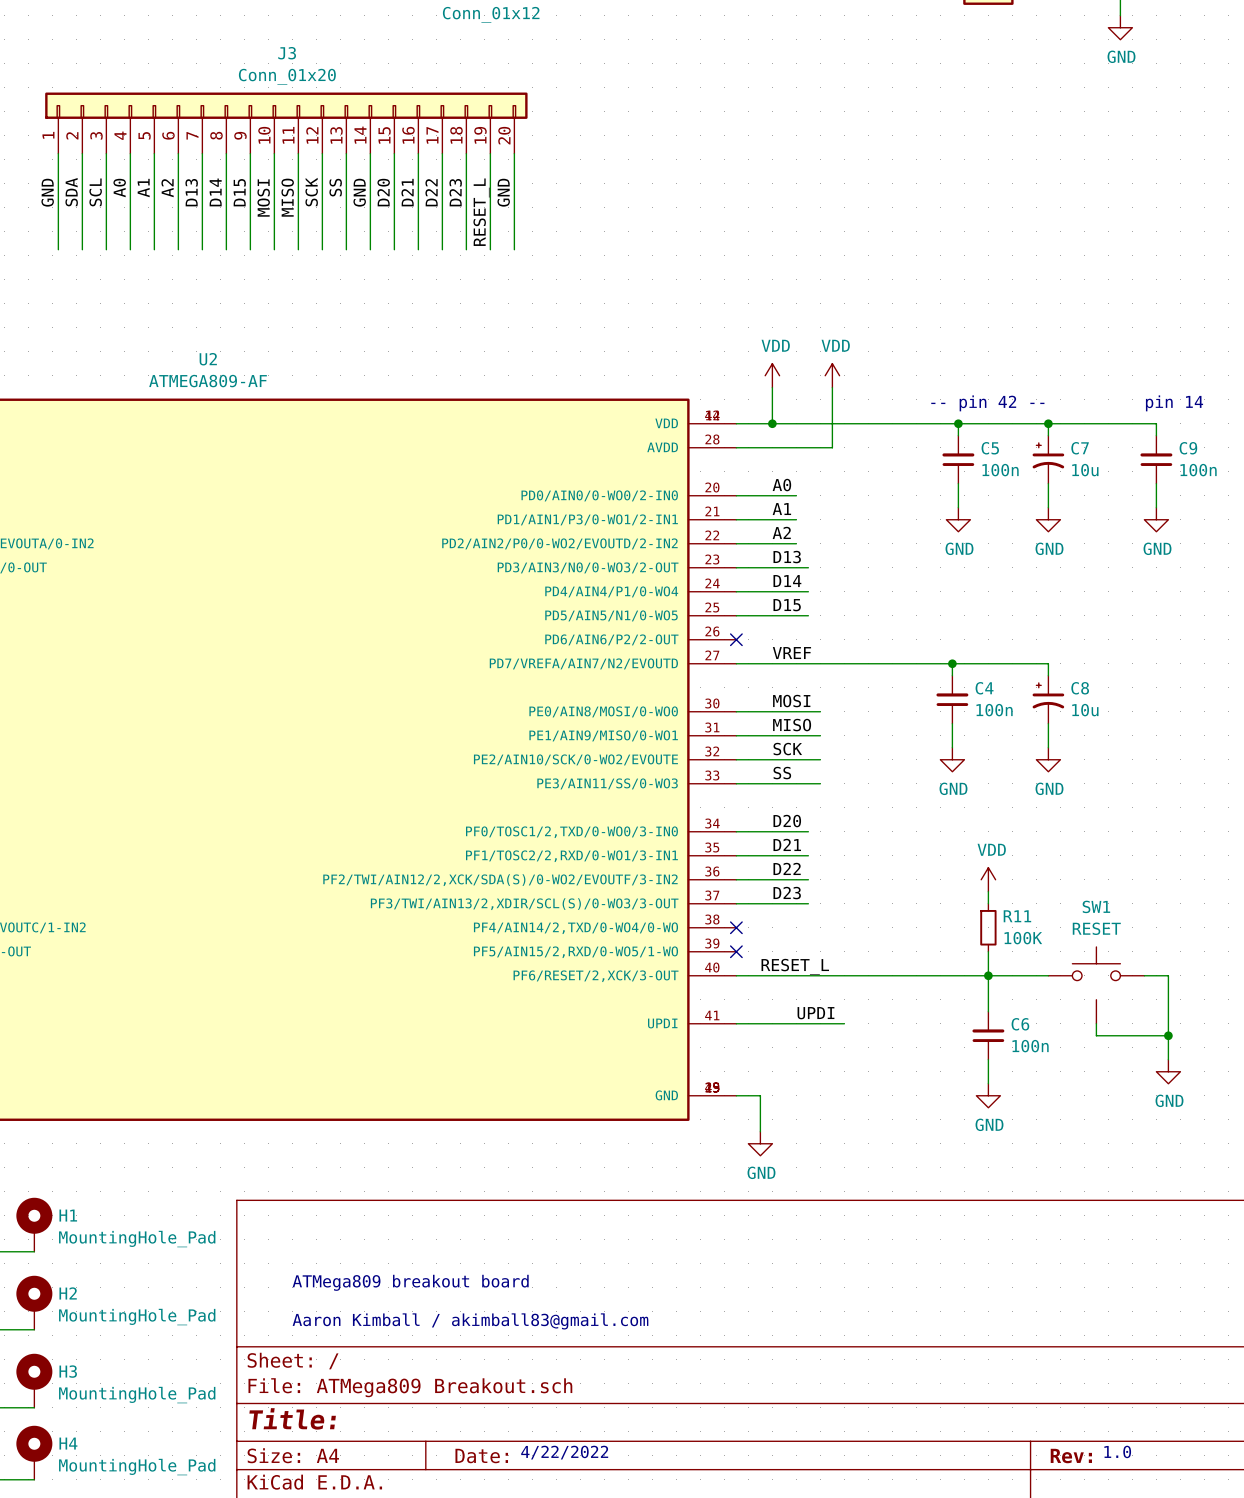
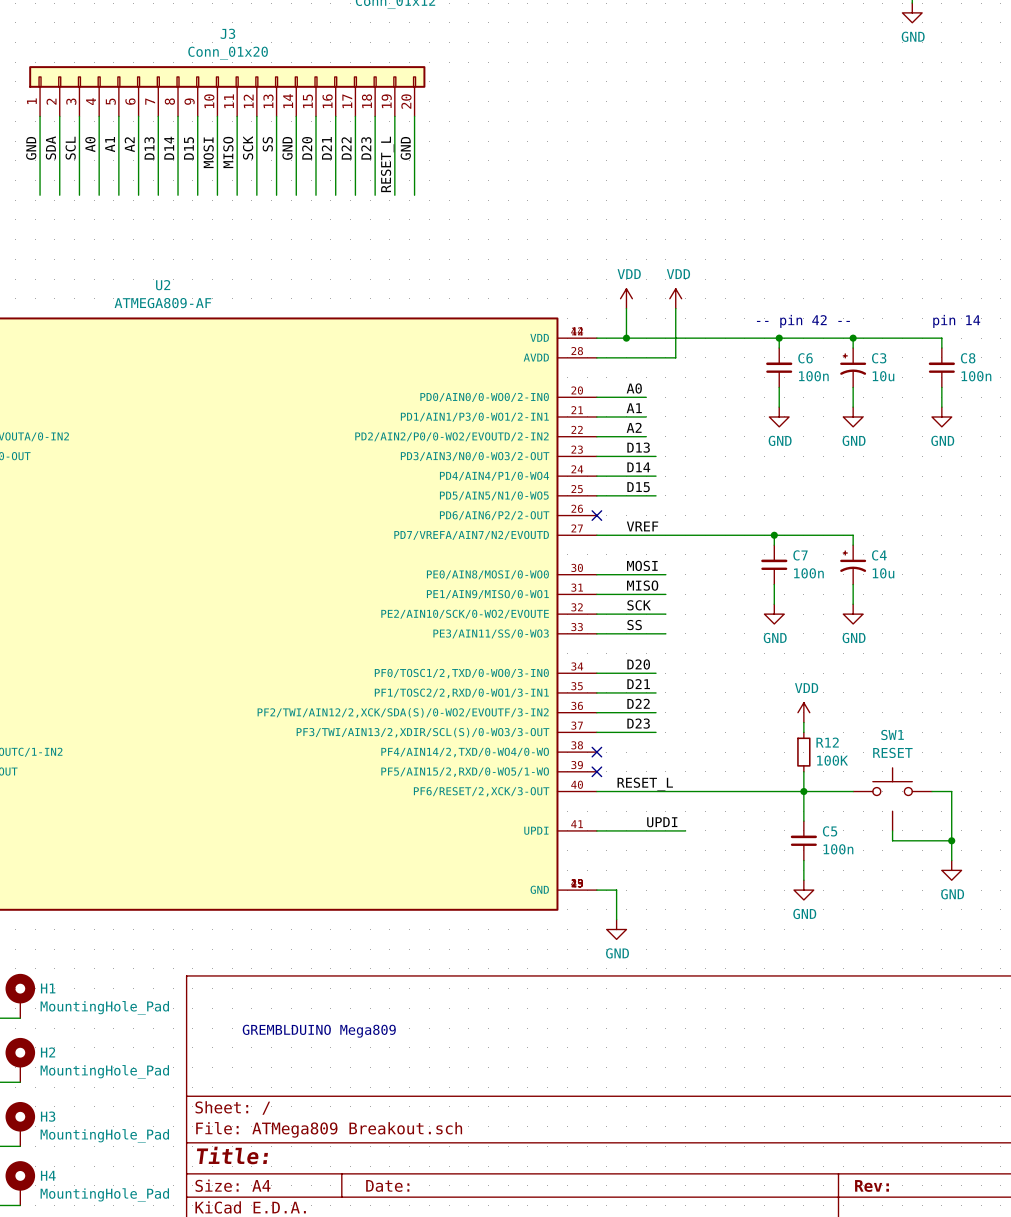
C5 name: C5 (990, 448) -> C6 (805, 358)
C7 name: C7 (1080, 448) -> C3 (879, 358)
C9 name: C9 (1188, 448) -> C8 (968, 358)
C4 name: C4 (984, 688) -> C7 (800, 555)
C8 name: C8 (1080, 688) -> C4 (879, 555)
R11 name: R11 (1017, 916) -> R12 (827, 742)
C6 name: C6 (1020, 1024) -> C5 (830, 831)
text: none -> GREMBLDUINO Mega809 (319, 1031)
text: ATMega809 breakout board (410, 1282) -> none
text: Aaron Kimball / akimball83@gmail.com (470, 1321) -> none
text: 1.0 (1117, 1451) -> none
text: 4/22/2022 (564, 1452) -> none

